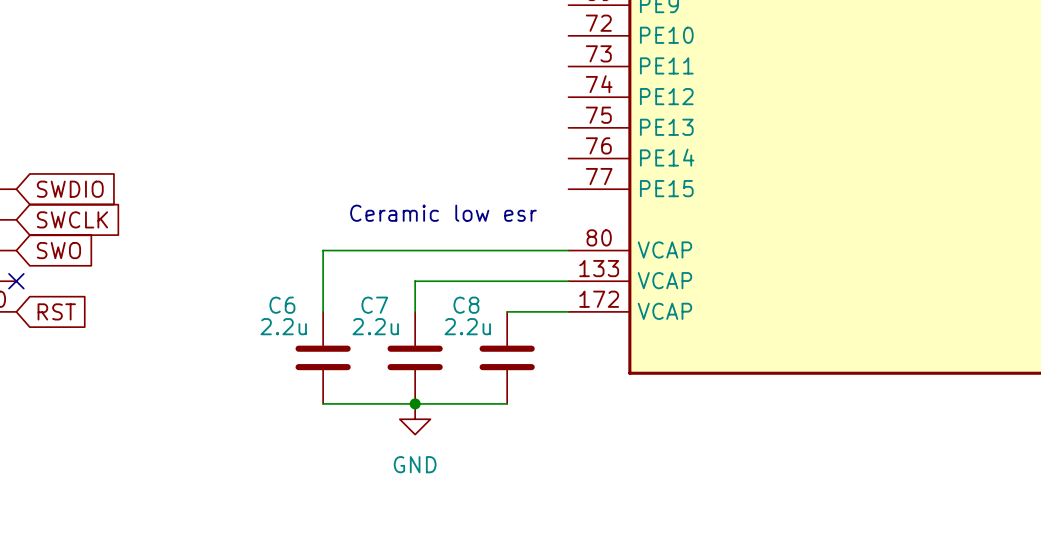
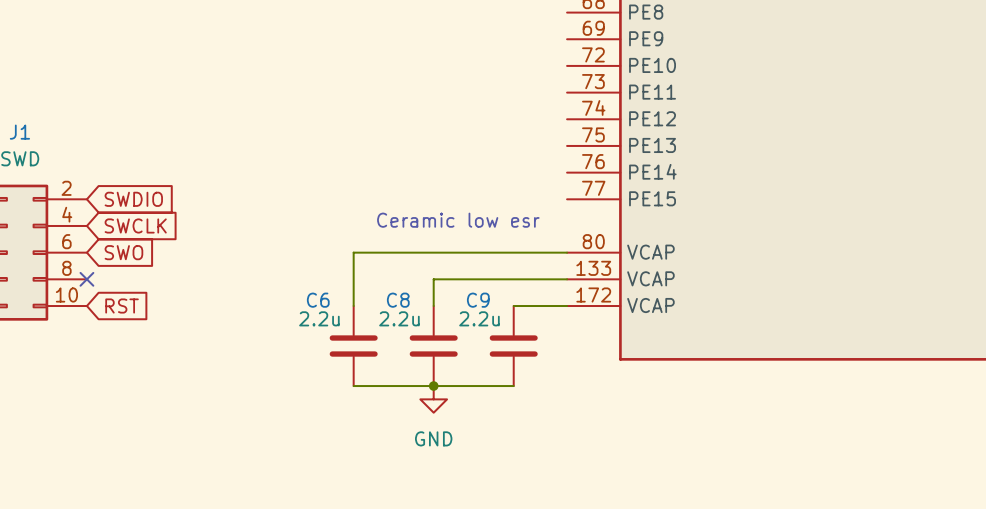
C7 name: C7 (374, 305) -> C8 (398, 300)
C8 name: C8 (466, 305) -> C9 (478, 300)

